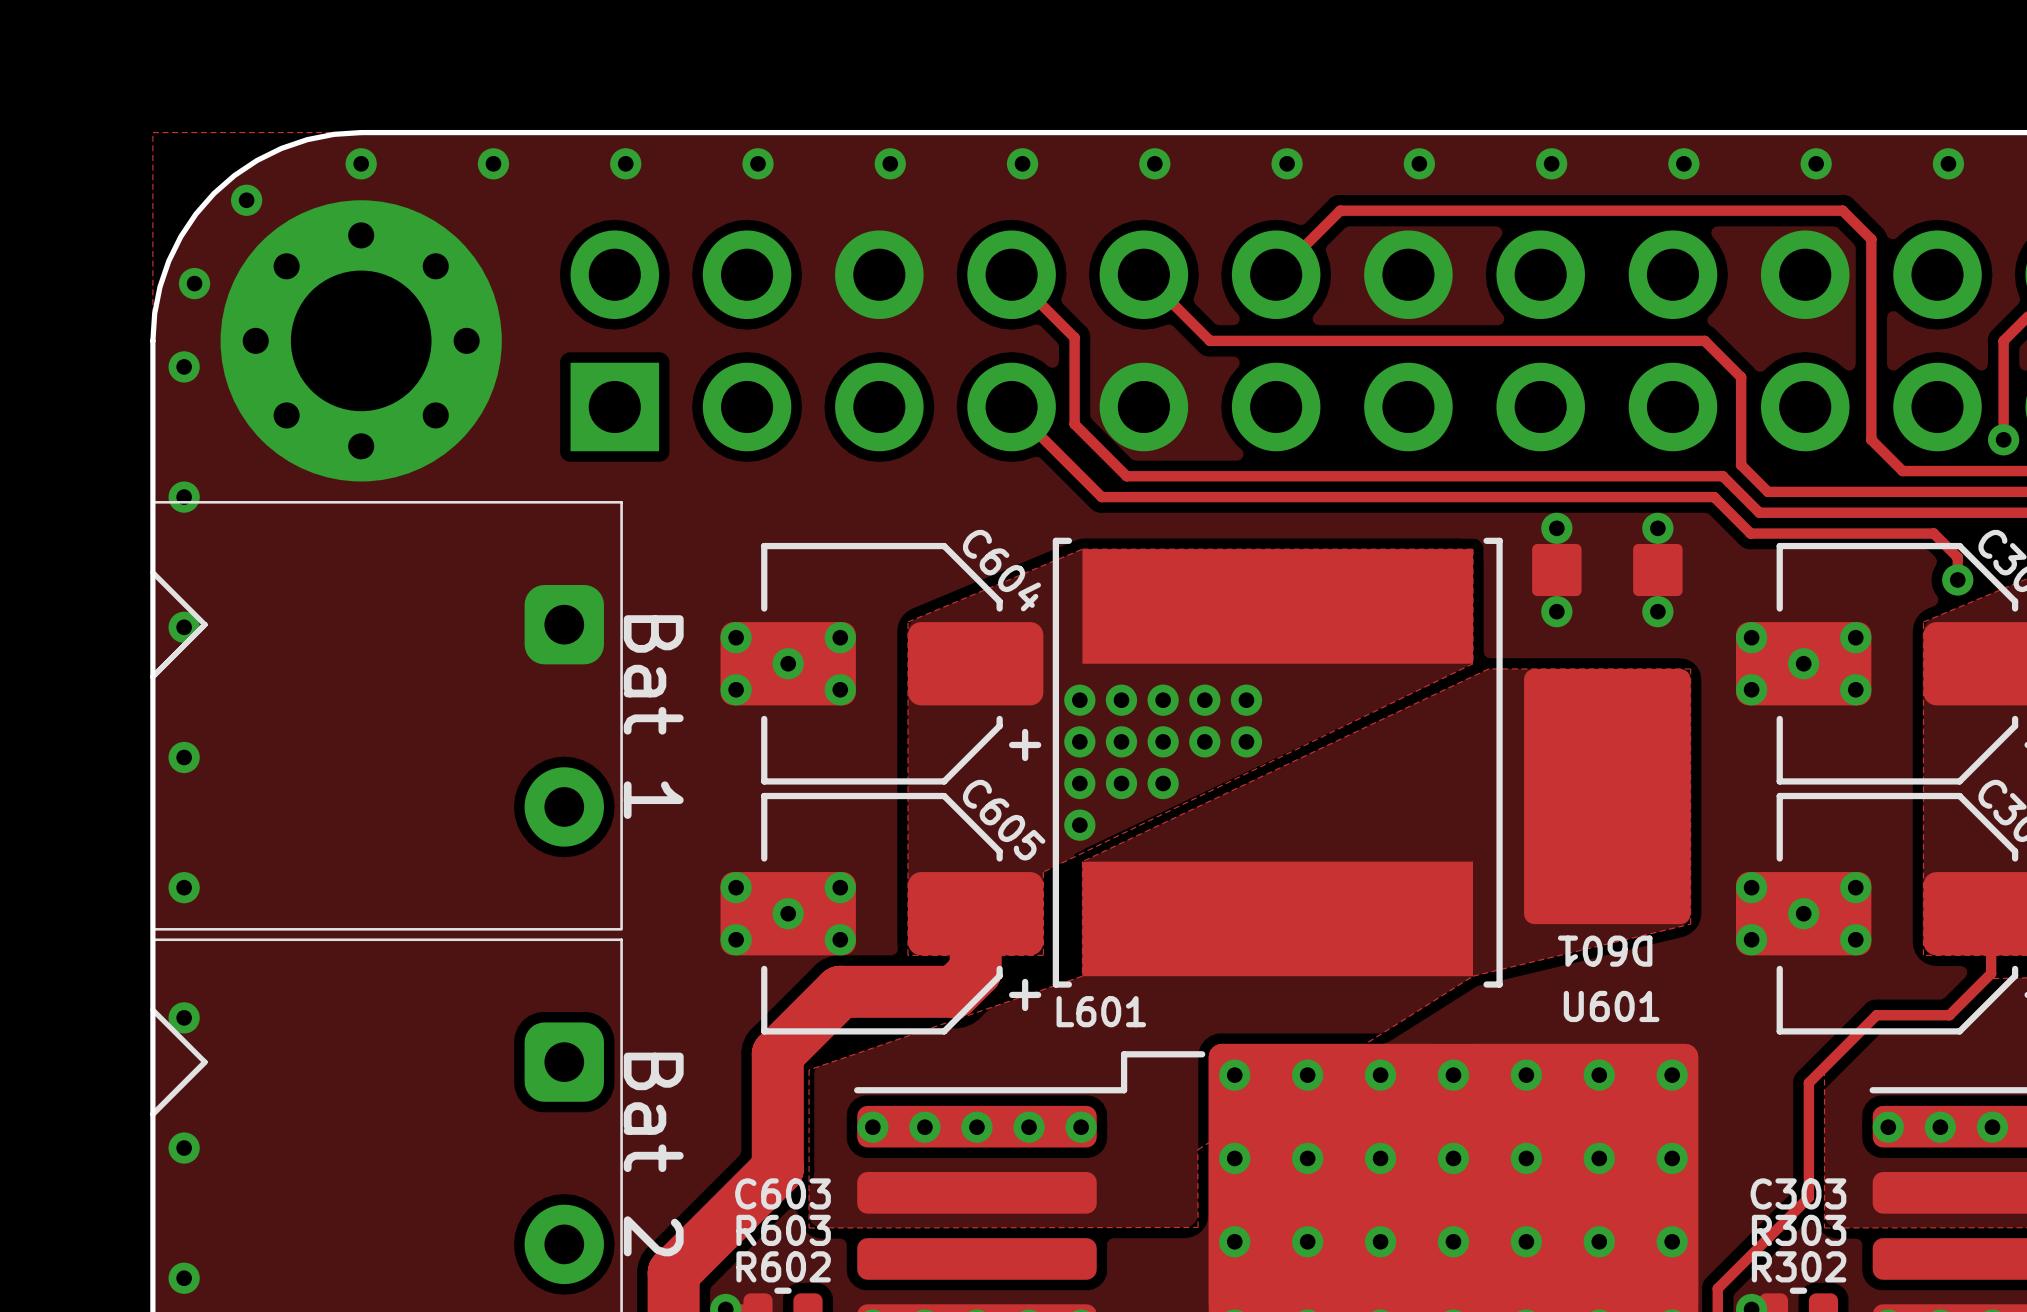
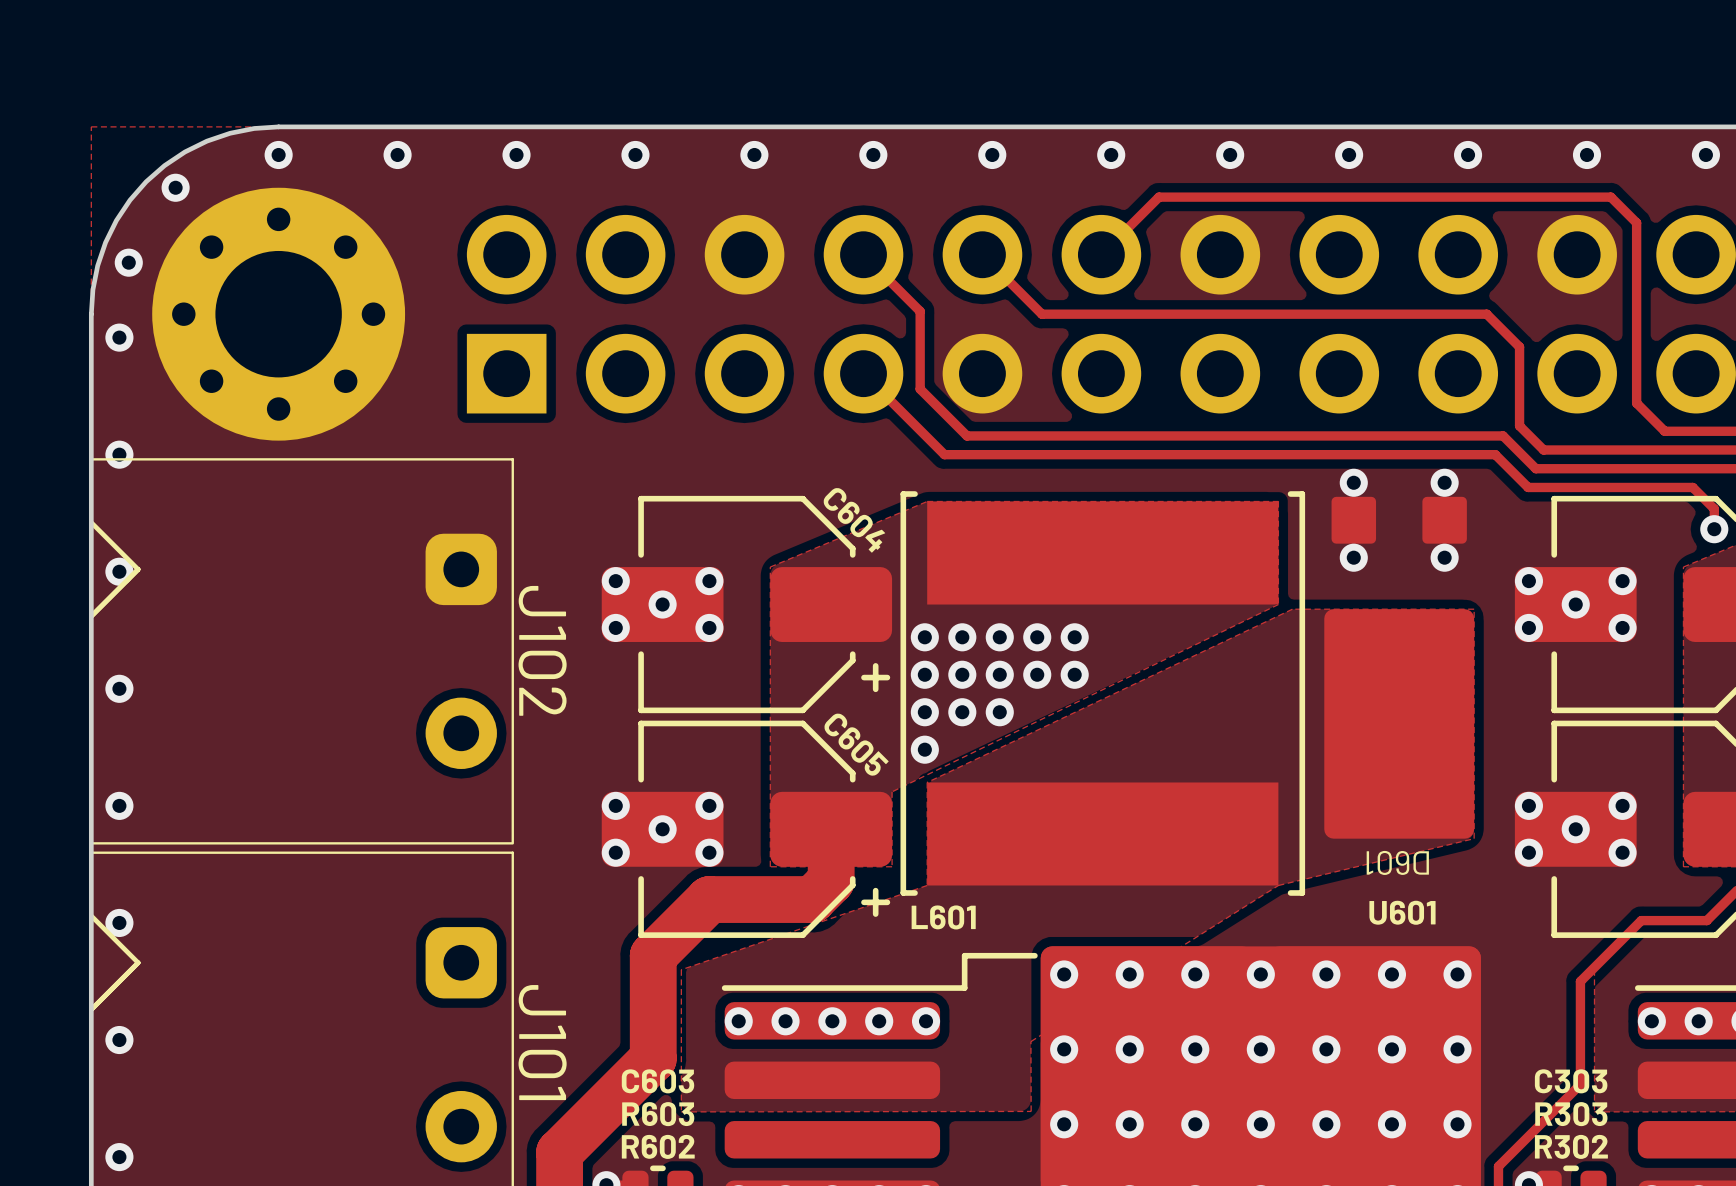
J102 name: none -> J102 (542, 650)
J102 value: Bat 1 (653, 717) -> none
J101 name: none -> J101 (542, 1042)
J101 value: Bat 2 (653, 1154) -> none

